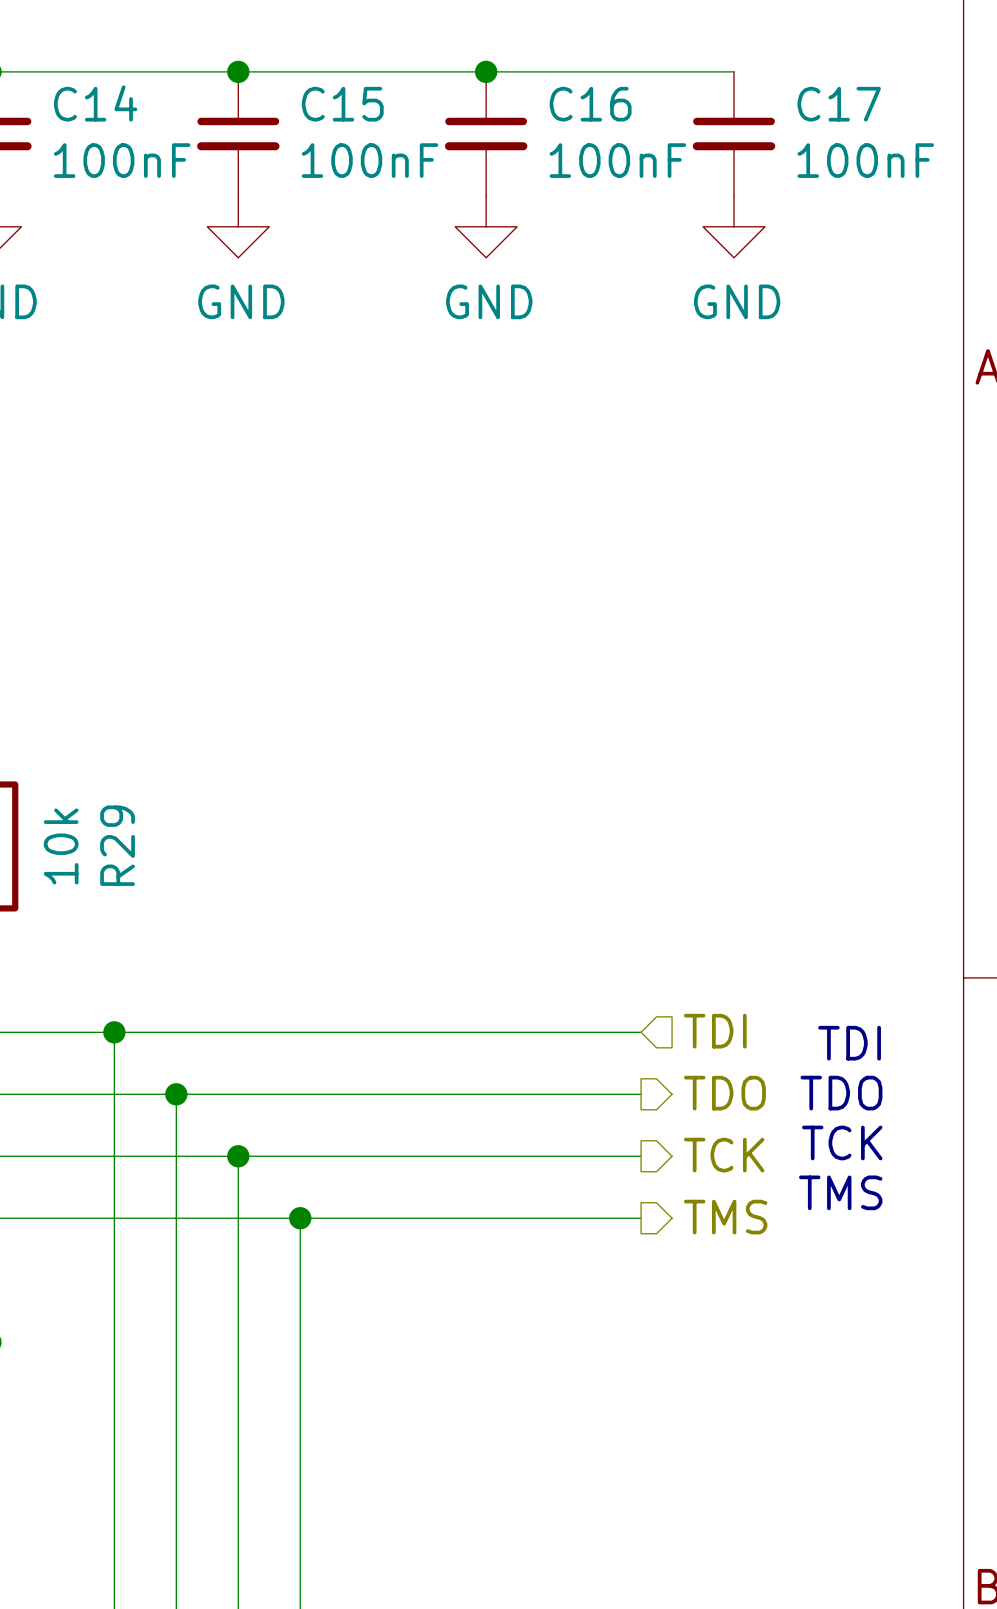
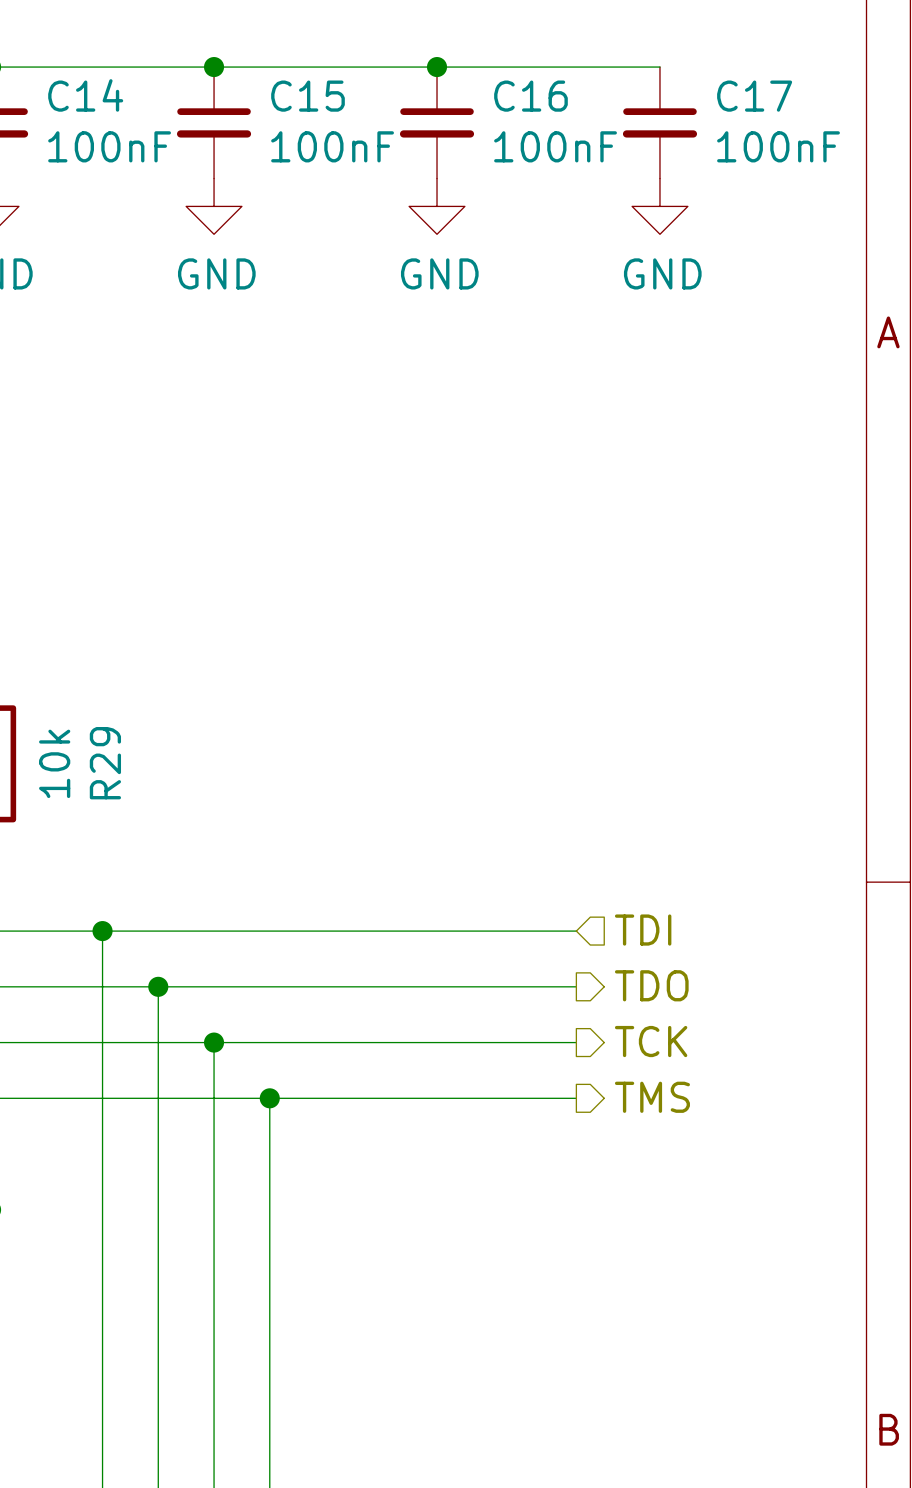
text: TDI (849, 1043) -> none
text: TDO (841, 1093) -> none
text: TCK (842, 1142) -> none
text: TMS (840, 1192) -> none

